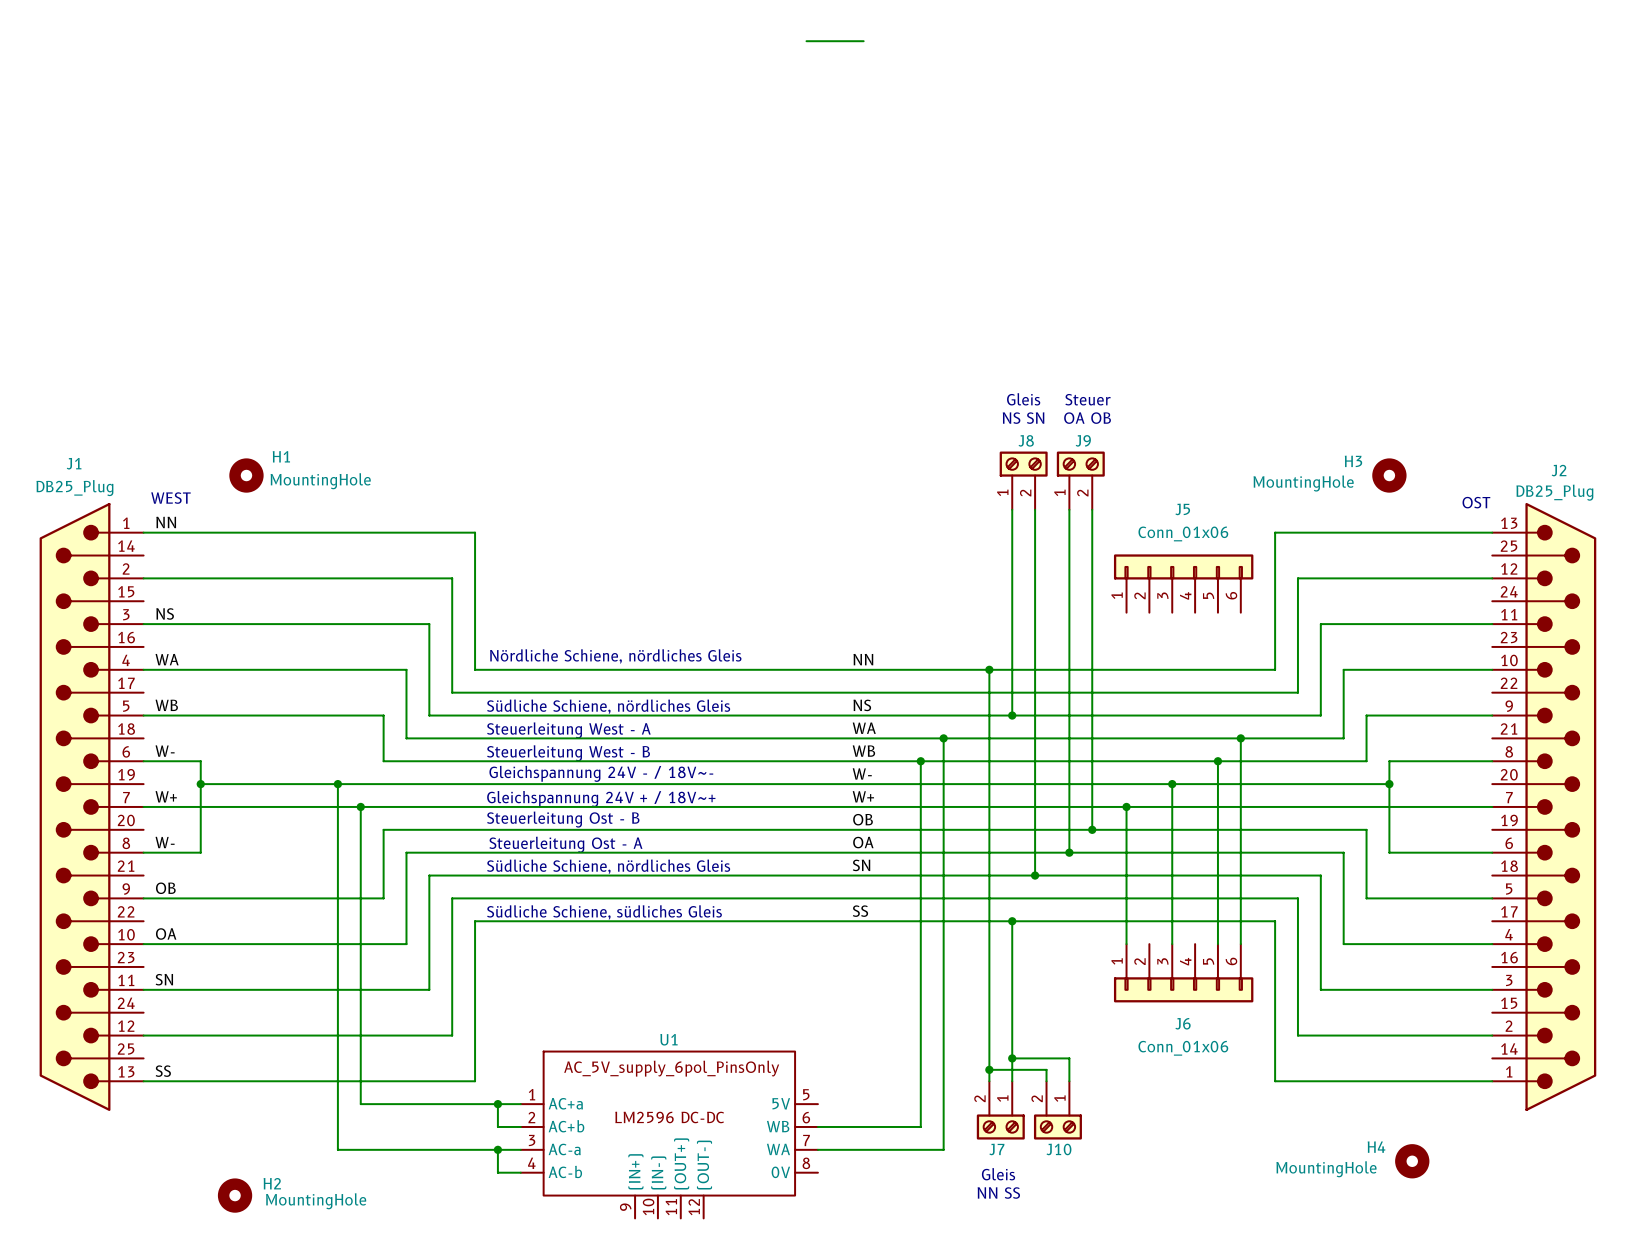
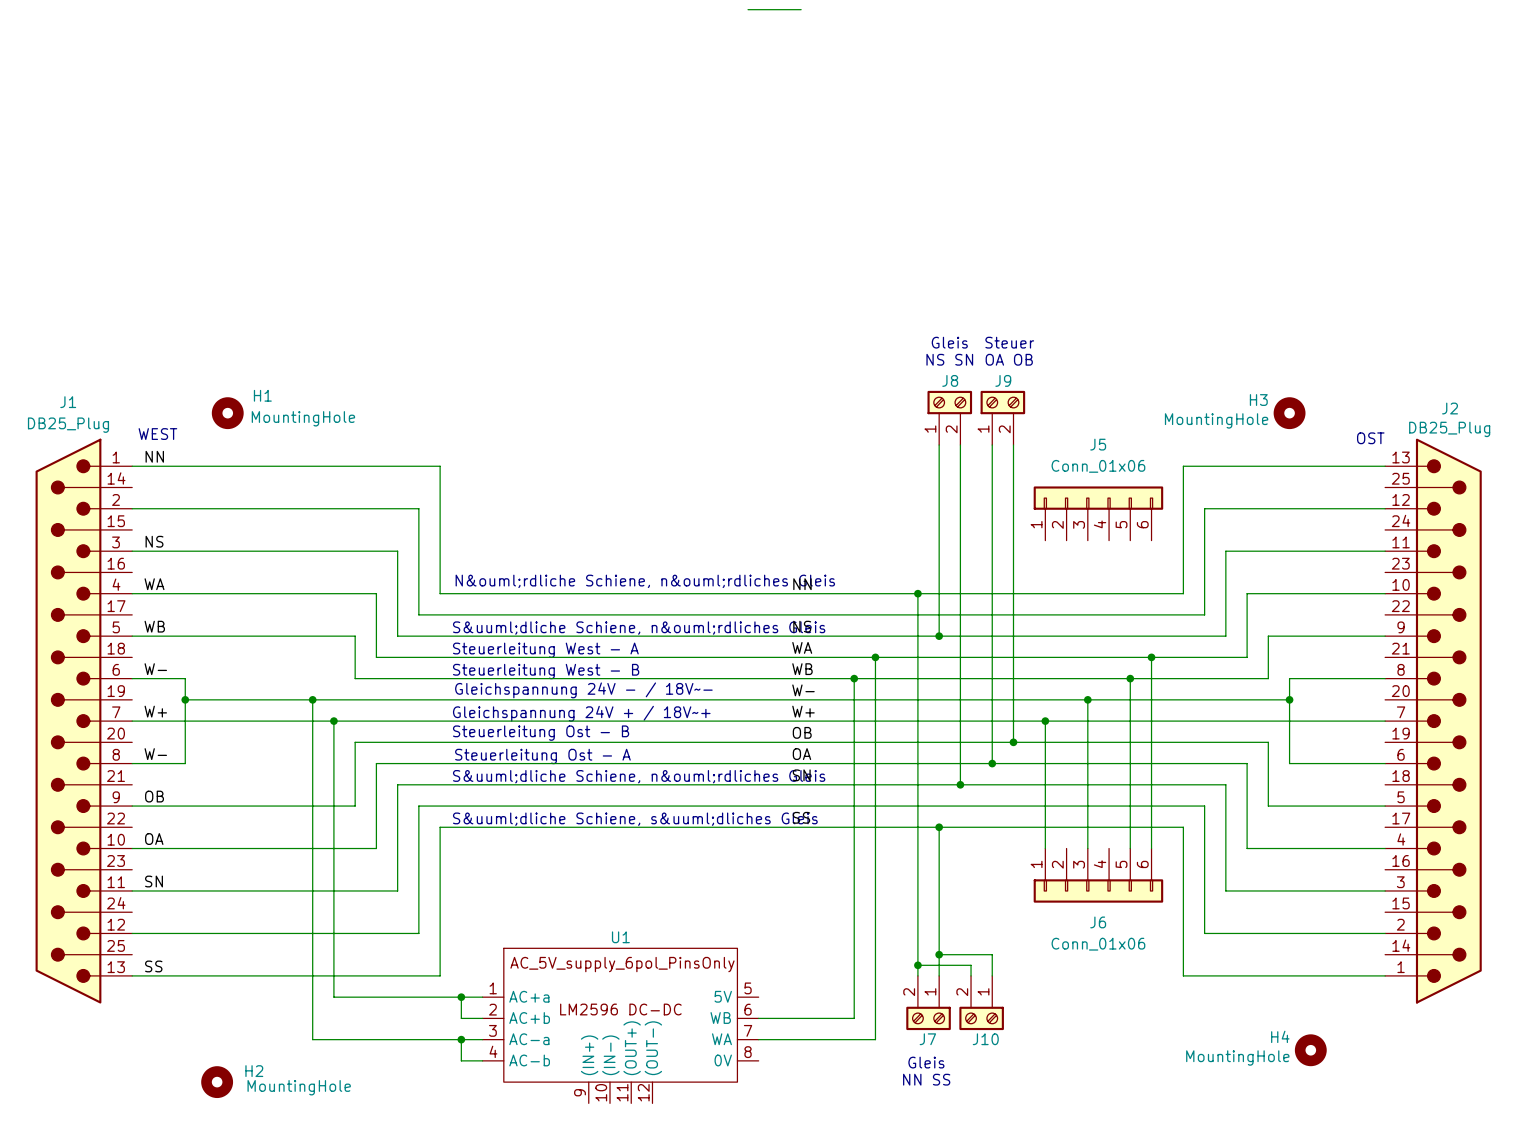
text: Nördliche Schiene, nördliches Gleis (615, 656) -> N&ouml;rdliche Schiene, n&ouml;rdliches Gleis (645, 581)
text: Südliche Schiene, nördliches Gleis (608, 706) -> S&uuml;dliche Schiene, n&ouml;rdliches Gleis (639, 628)
text: Südliche Schiene, nördliches Gleis (608, 866) -> S&uuml;dliche Schiene, n&ouml;rdliches Gleis (639, 776)
text: Südliche Schiene, südliches Gleis (604, 912) -> S&uuml;dliche Schiene, s&uuml;dliches Gleis (635, 819)

